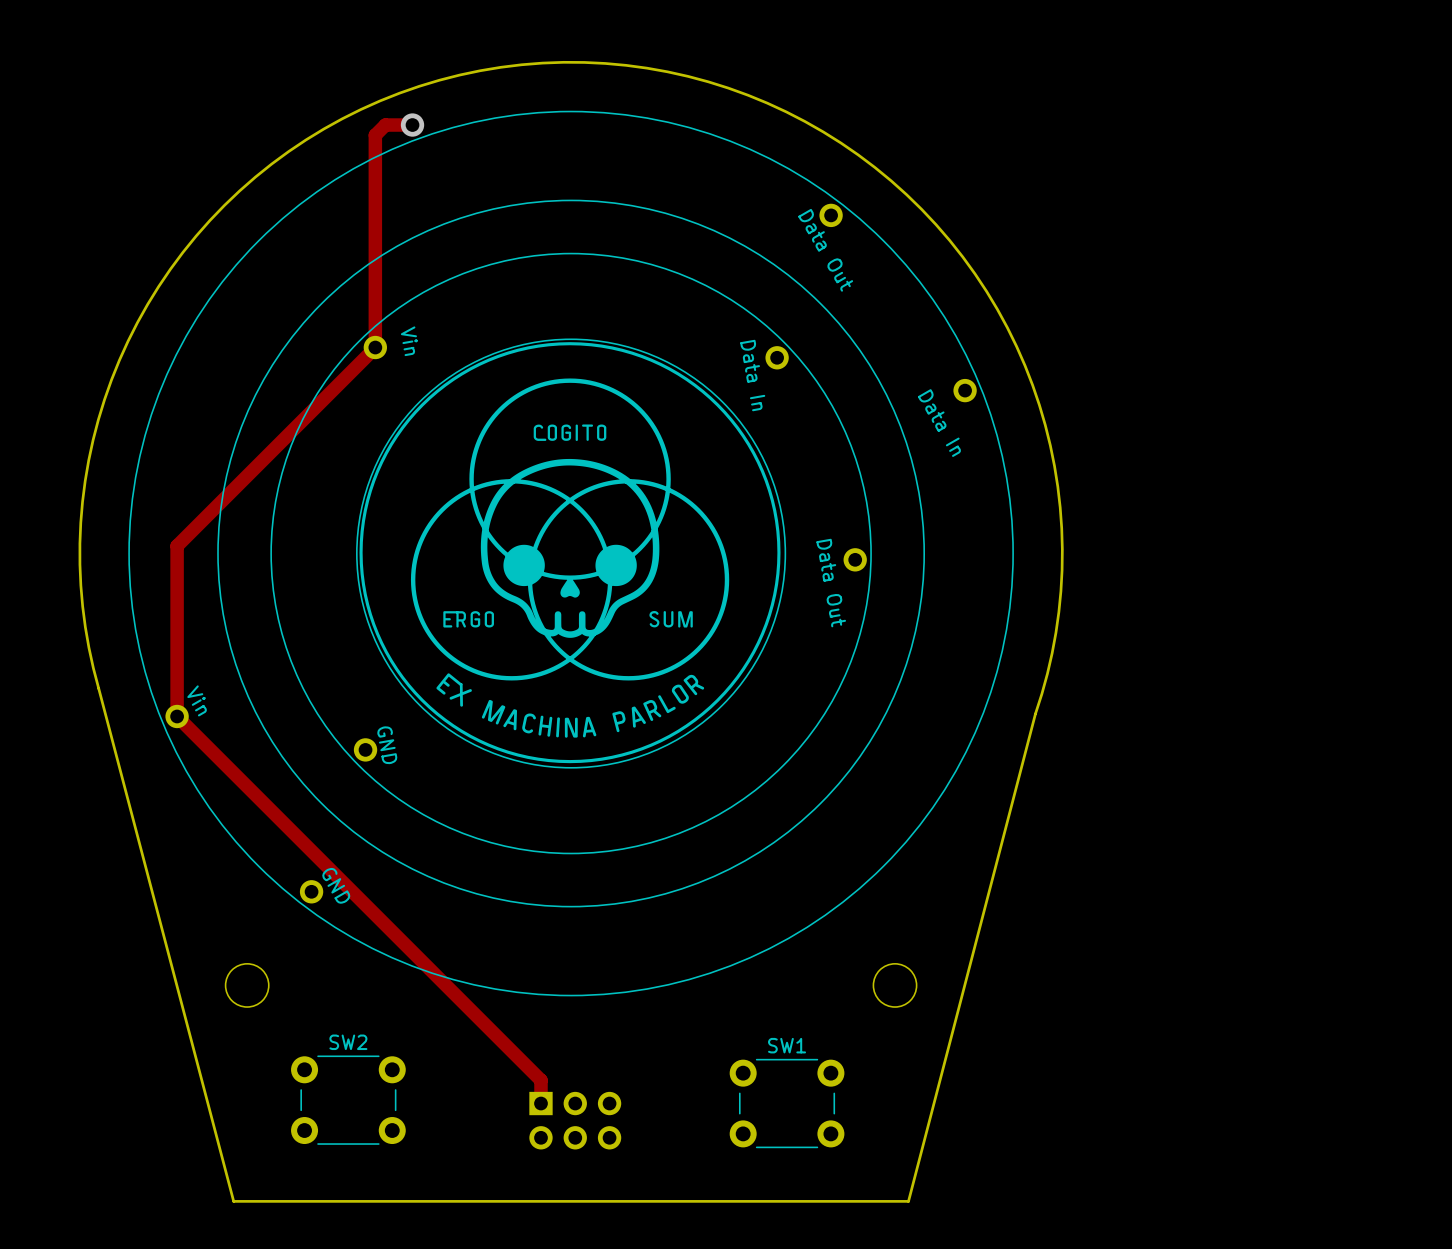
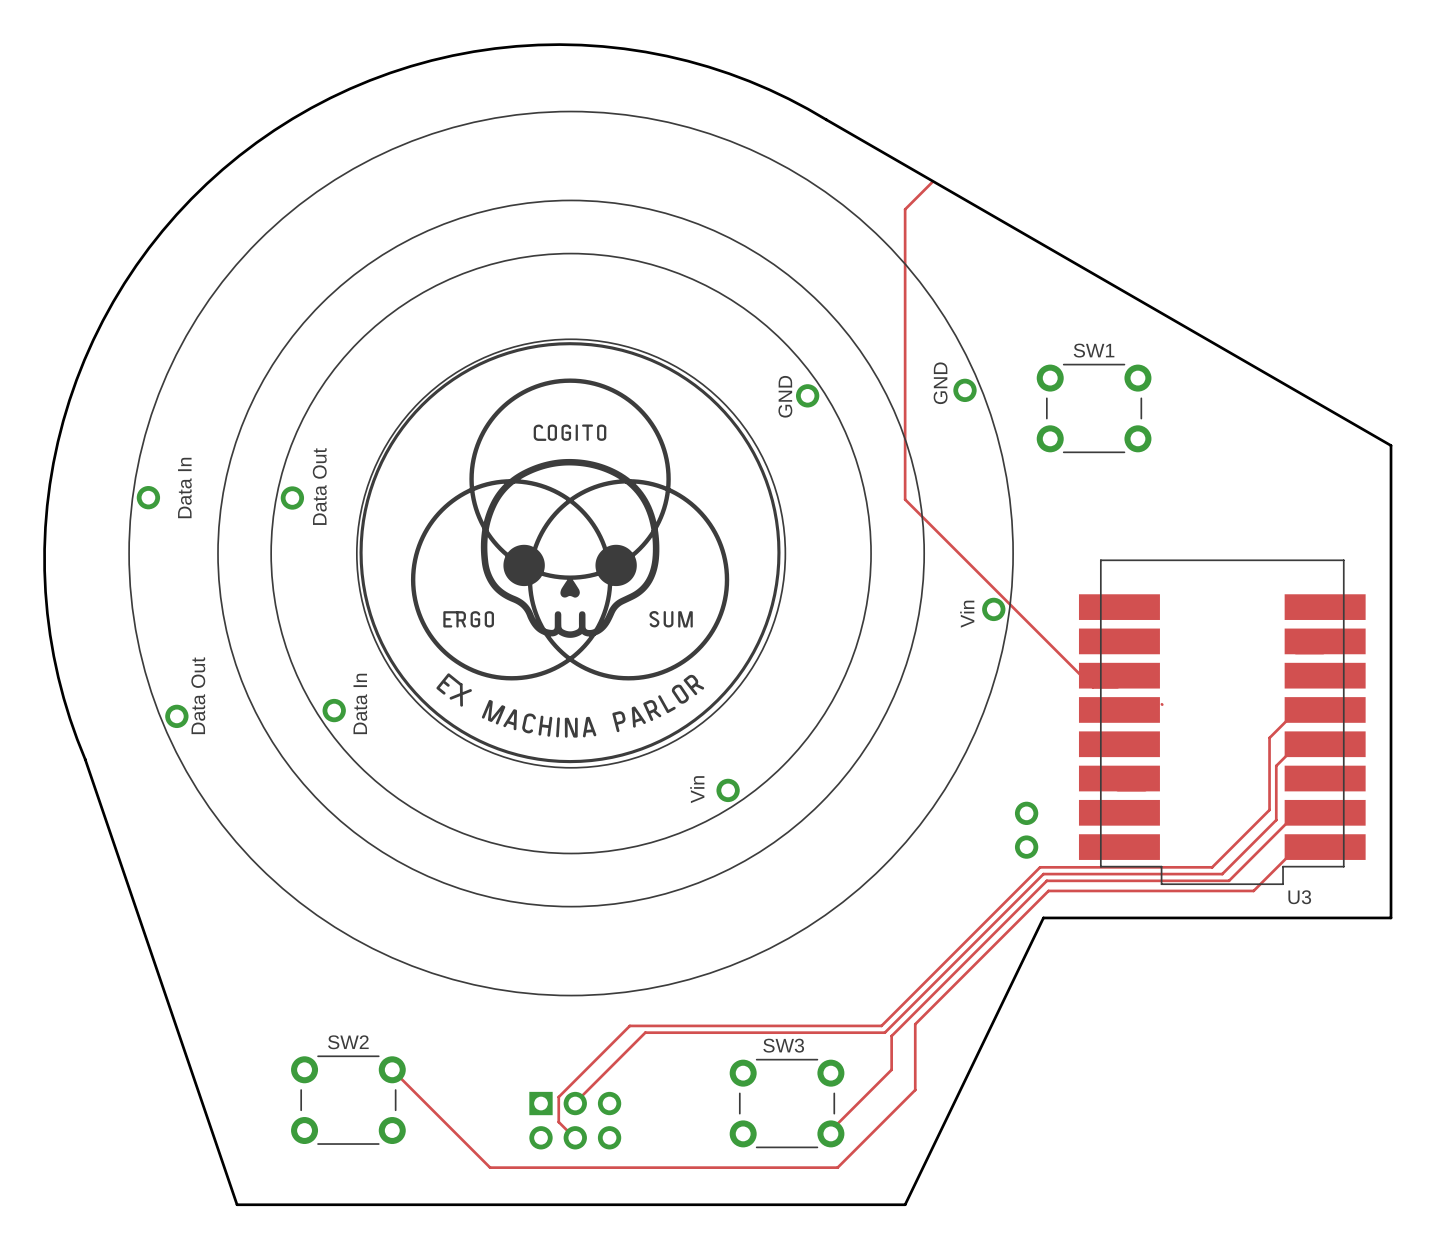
track: (412, 125) (385, 125) (375, 135) (375, 347) (177, 546) (177, 716) (541, 1080) (541, 1103) -> none
via: (412, 125) -> none
track: none -> (932, 182) (905, 209) (905, 499) (1092, 687) (1117, 687)
SW1: none -> (1094, 408)
part: (571, 553) -> none
part: (571, 553) -> none
part: none -> (571, 553)
part: none -> (571, 553)
board edge: (98, 688) (233, 1201) (908, 1201) (1047, 673) (1055, 632) (1060, 591) (1061, 528) (1054, 466) (1045, 425) (1032, 385) (1016, 346) (997, 309) (962, 256) (936, 224) (891, 180) (858, 154) (804, 121) (767, 103) (708, 81) (667, 71) (626, 65) (584, 62) (521, 64) (480, 70) (439, 80) (399, 93) (360, 109) (306, 139) (271, 163) (239, 190) (196, 236) (170, 269) (147, 304) (119, 360) (104, 399) (88, 460) (82, 501) (79, 543) (80, 585) (85, 627) (98, 688) -> (826, 119) (788, 98) (729, 73) (666, 56) (624, 48) (559, 44) (516, 46) (452, 55) (410, 66) (369, 80) (330, 98) (292, 118) (239, 155) (206, 183) (162, 231) (136, 265) (102, 320) (84, 359) (69, 400) (57, 441) (49, 484) (45, 527) (44, 570) (50, 635) (58, 677) (70, 718) (237, 1204) (905, 1204) (1043, 917) (1391, 917) (1391, 445) (826, 119)
track: none -> (1161, 704) (1162, 704)
track: none -> (1325, 709) (1297, 709) (1269, 737) (1269, 809) (1212, 867) (1040, 867) (881, 1025) (629, 1025) (558, 1097) (558, 1122) (574, 1137)
U3: none -> (1222, 722)
track: none -> (1325, 744) (1297, 744) (1276, 765) (1276, 820) (1222, 874) (1043, 874) (884, 1032) (645, 1032) (574, 1103)
track: none -> (1325, 812) (1297, 812) (1229, 880) (1046, 880) (891, 1036) (891, 1069) (830, 1130)
via: none -> (1026, 813)
via: none -> (1026, 847)
track: none -> (1325, 847) (1297, 847) (1253, 890) (1048, 890) (915, 1024) (915, 1090) (837, 1167) (490, 1167) (392, 1069)
round board edge: [225, 963, 270, 1008] -> none
round board edge: [873, 963, 917, 1008] -> none
SW1 name: SW1 (787, 1045) -> SW3 (783, 1045)

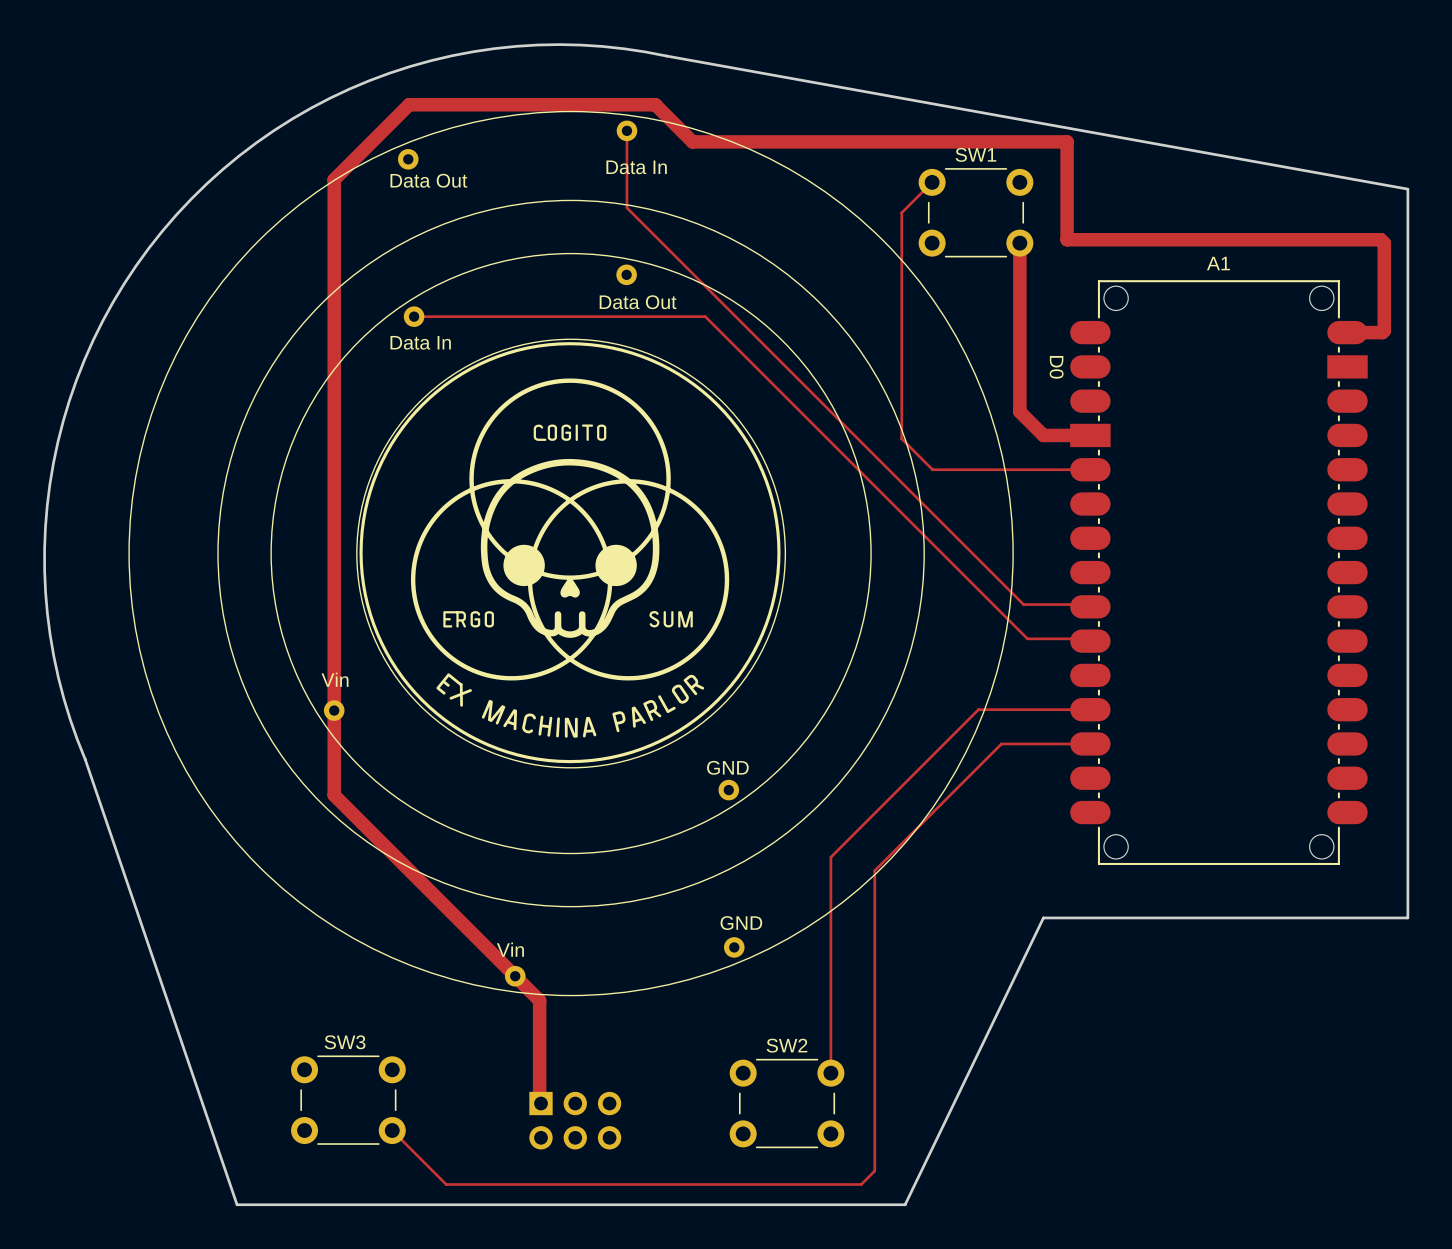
track: none -> (626, 130) (626, 207) (1023, 604) (1088, 604) (1090, 606)
track: (905, 209) (905, 499) (1092, 687) (1117, 687) -> (905, 209) (901, 212) (901, 438) (932, 469) (1090, 469)
track: none -> (1019, 243) (1019, 411) (1043, 435) (1090, 435)
track: none -> (414, 316) (705, 316) (1027, 638) (1088, 638) (1090, 641)
track: none -> (1347, 332) (1382, 332) (1384, 330) (1384, 243) (1380, 239) (1067, 239) (1067, 141) (692, 141) (655, 104) (409, 104) (334, 179) (334, 795) (539, 1000) (539, 1103)
SW1 position: (1094, 408) -> (975, 212)
part: (571, 553) -> none
part: (571, 553) -> none
part: none -> (571, 553)
part: none -> (571, 553)
A1: none -> (1218, 572)
track: (1161, 704) (1162, 704) -> none
track: none -> (1090, 709) (978, 709) (830, 857) (830, 1069)
track: (1325, 709) (1297, 709) (1269, 737) (1269, 809) (1212, 867) (1040, 867) (881, 1025) (629, 1025) (558, 1097) (558, 1122) (574, 1137) -> none
U3: (1222, 722) -> none
track: none -> (1090, 743) (1001, 743) (874, 870) (874, 1171) (861, 1184) (446, 1184) (392, 1130)
track: (1325, 744) (1297, 744) (1276, 765) (1276, 820) (1222, 874) (1043, 874) (884, 1032) (645, 1032) (574, 1103) -> none
board edge: (85, 759) (70, 718) (58, 677) (47, 613) (44, 548) (49, 484) (63, 421) (84, 359) (113, 301) (149, 247) (176, 214) (206, 183) (256, 142) (311, 107) (369, 80) (431, 60) (495, 48) (559, 44) (624, 48) (666, 56) (708, 66) (749, 81) (788, 98) (1391, 445) (1391, 917) -> (85, 759) (63, 698) (50, 635) (44, 570) (47, 505) (53, 463) (63, 421) (84, 359) (113, 302) (148, 248) (191, 199) (239, 155) (292, 118) (330, 98) (369, 80) (431, 60) (494, 48) (559, 44) (624, 48) (1407, 189) (1407, 917) (1391, 917)
track: (1325, 812) (1297, 812) (1229, 880) (1046, 880) (891, 1036) (891, 1069) (830, 1130) -> none
via: (1026, 813) -> none
via: (1026, 847) -> none
track: (1325, 847) (1297, 847) (1253, 890) (1048, 890) (915, 1024) (915, 1090) (837, 1167) (490, 1167) (392, 1069) -> none
SW2 name: SW2 (348, 1042) -> SW3 (345, 1042)
SW3 name: SW3 (783, 1045) -> SW2 (786, 1045)

